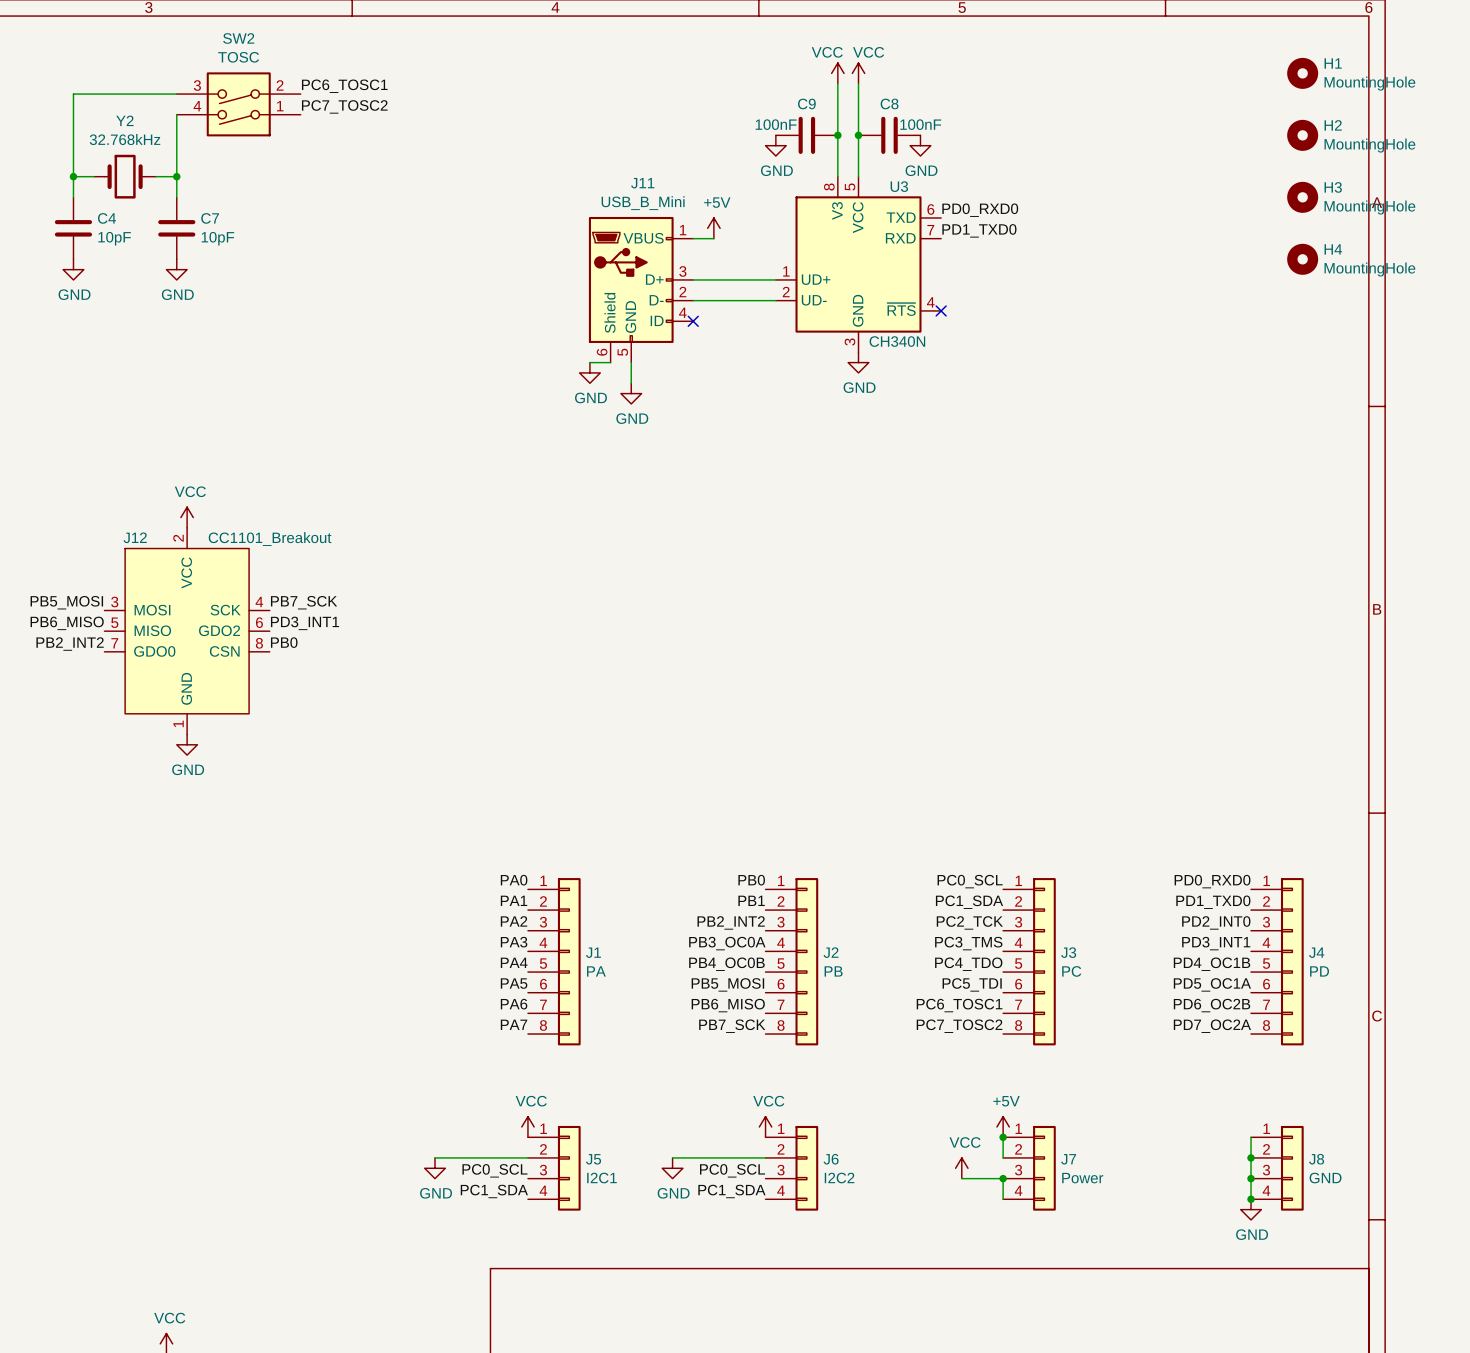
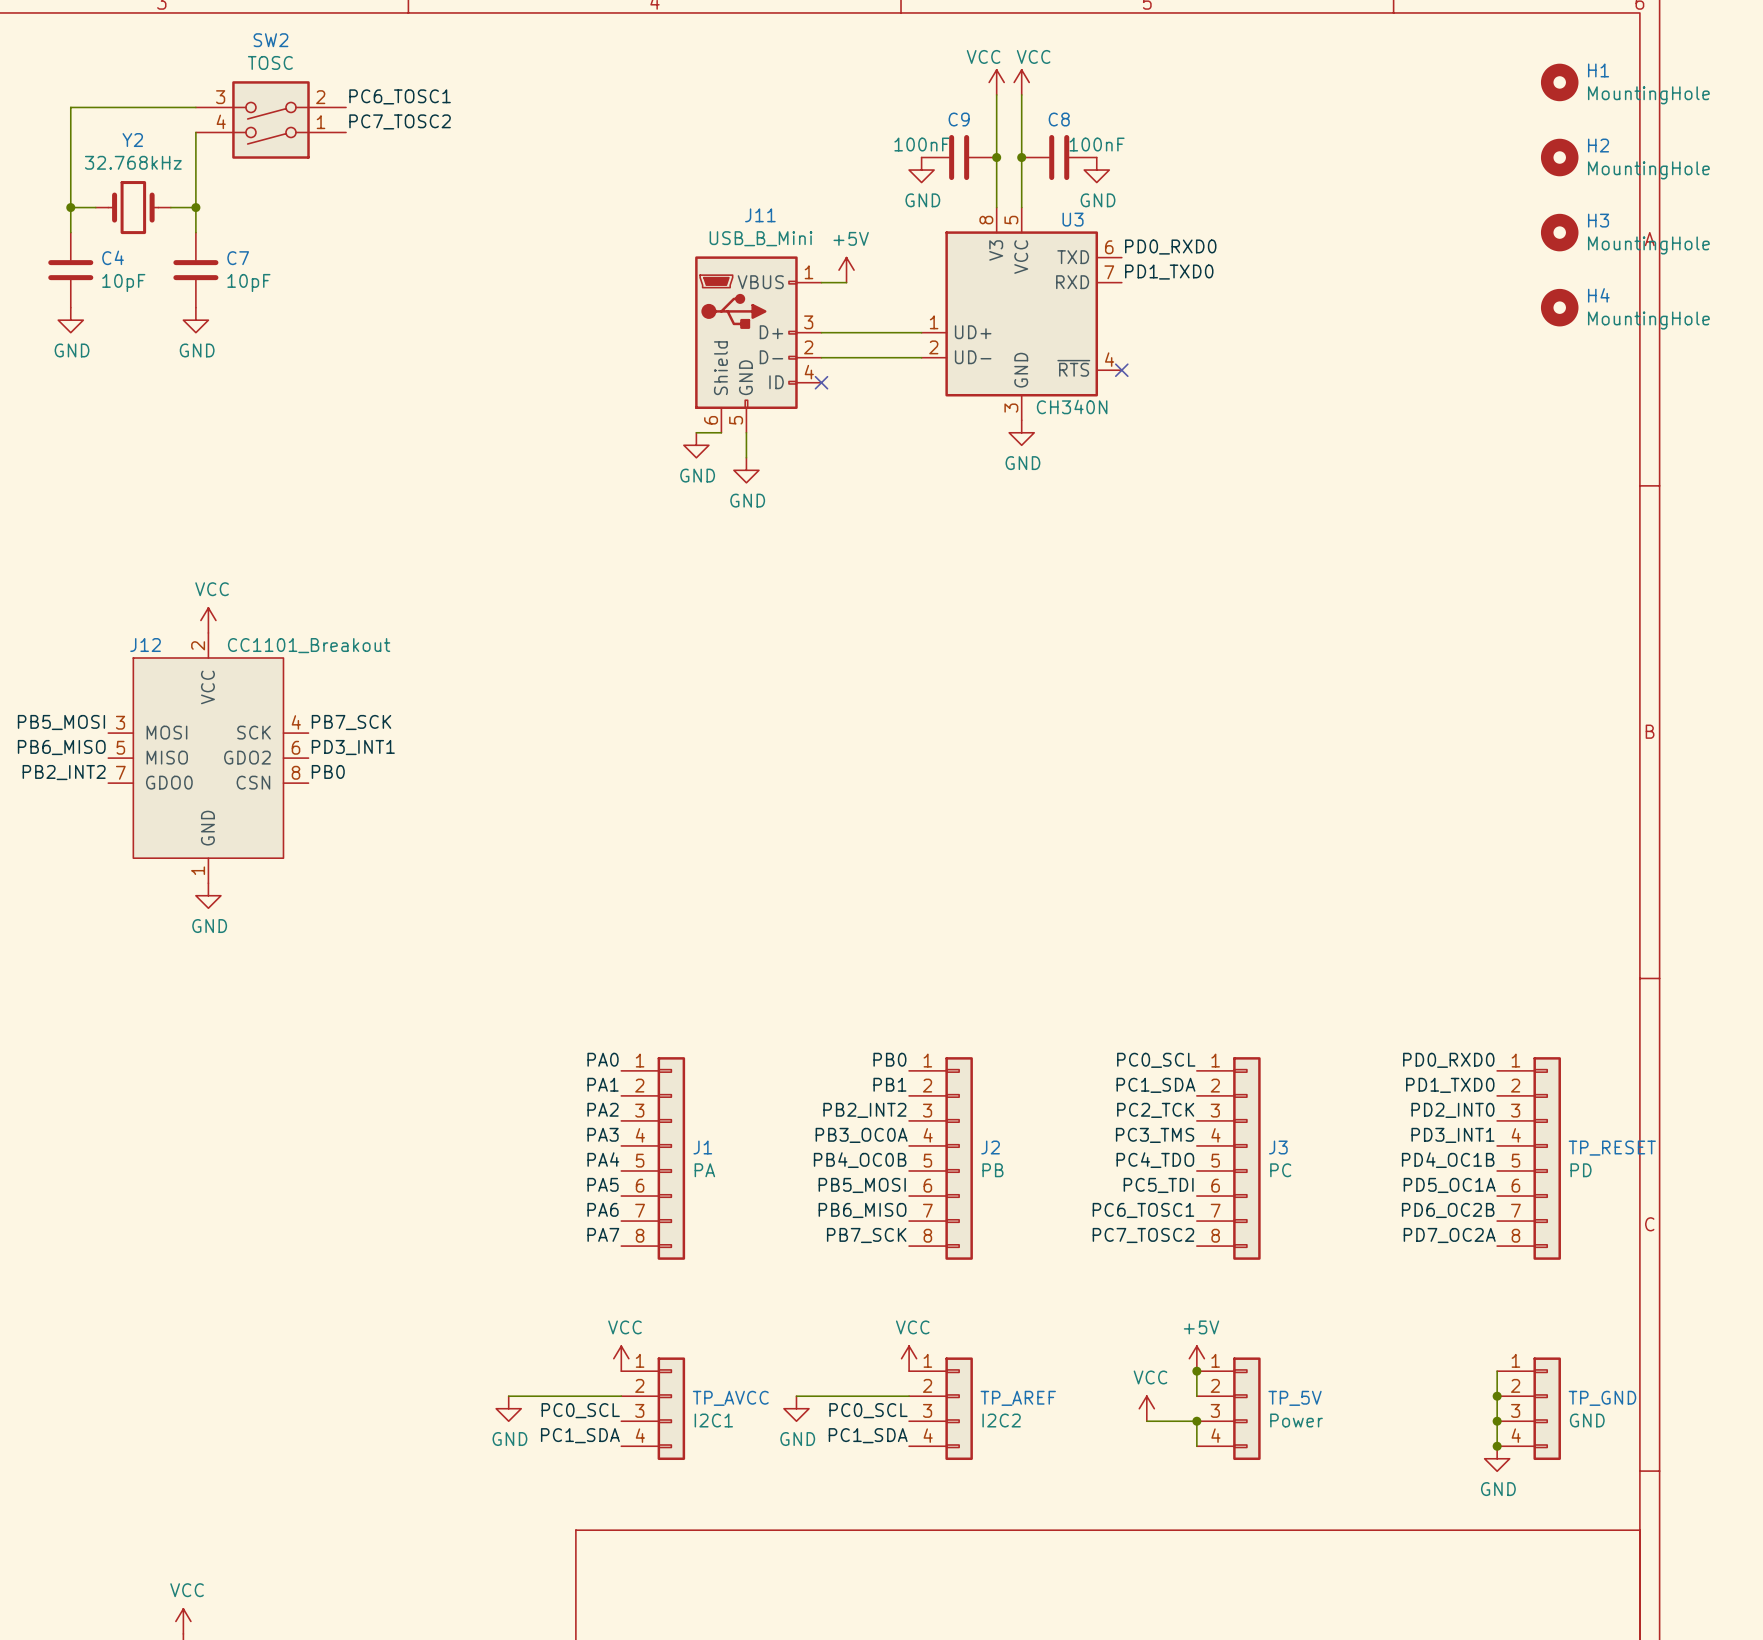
J4 name: J4 (1316, 952) -> TP_RESET (1612, 1148)
J5 name: J5 (593, 1159) -> TP_AVCC (730, 1398)
J6 name: J6 (831, 1159) -> TP_AREF (1018, 1398)
J7 name: J7 (1068, 1159) -> TP_5V (1295, 1398)
J8 name: J8 (1316, 1159) -> TP_GND (1602, 1398)

